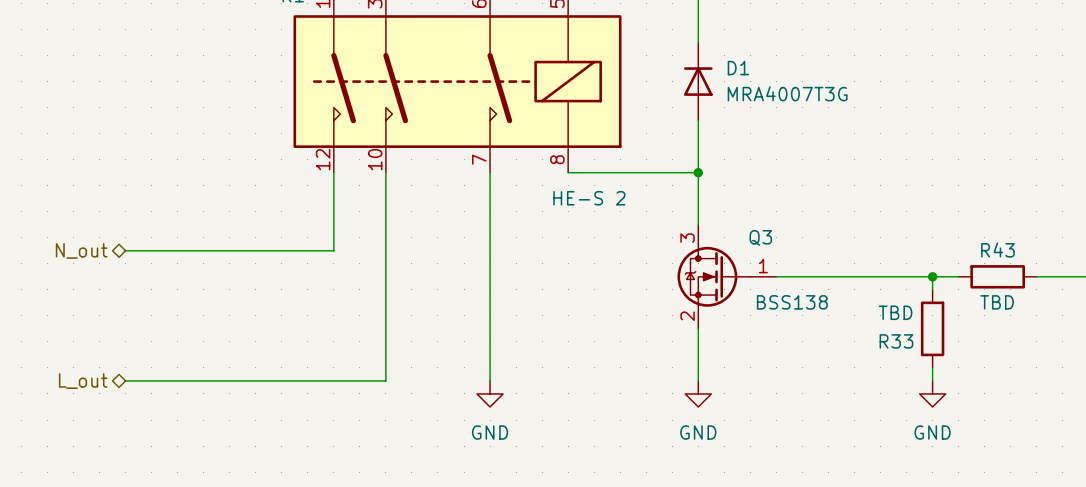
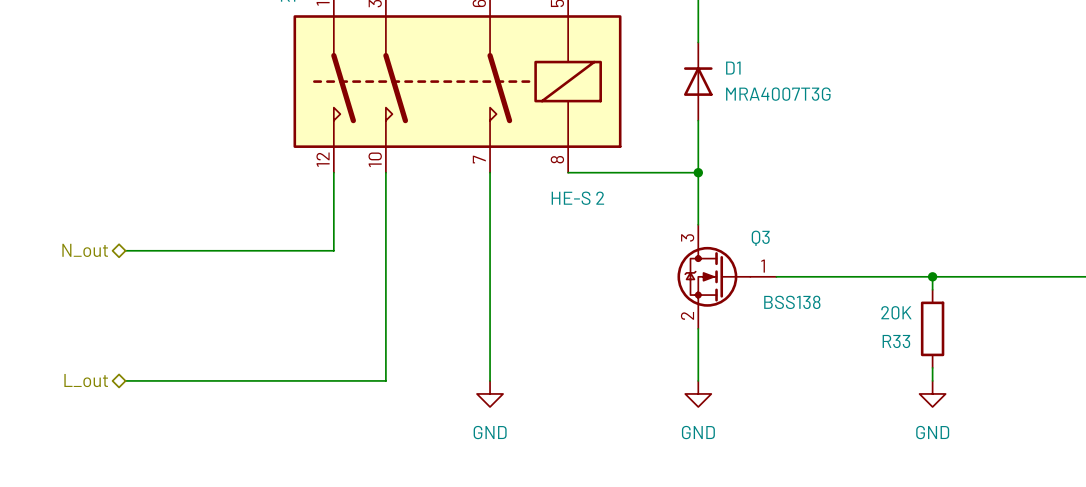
wire: none -> (958, 276) (1036, 276)
R43: TBD (997, 276) -> none
R33 value: TBD (895, 312) -> 20K (896, 312)

